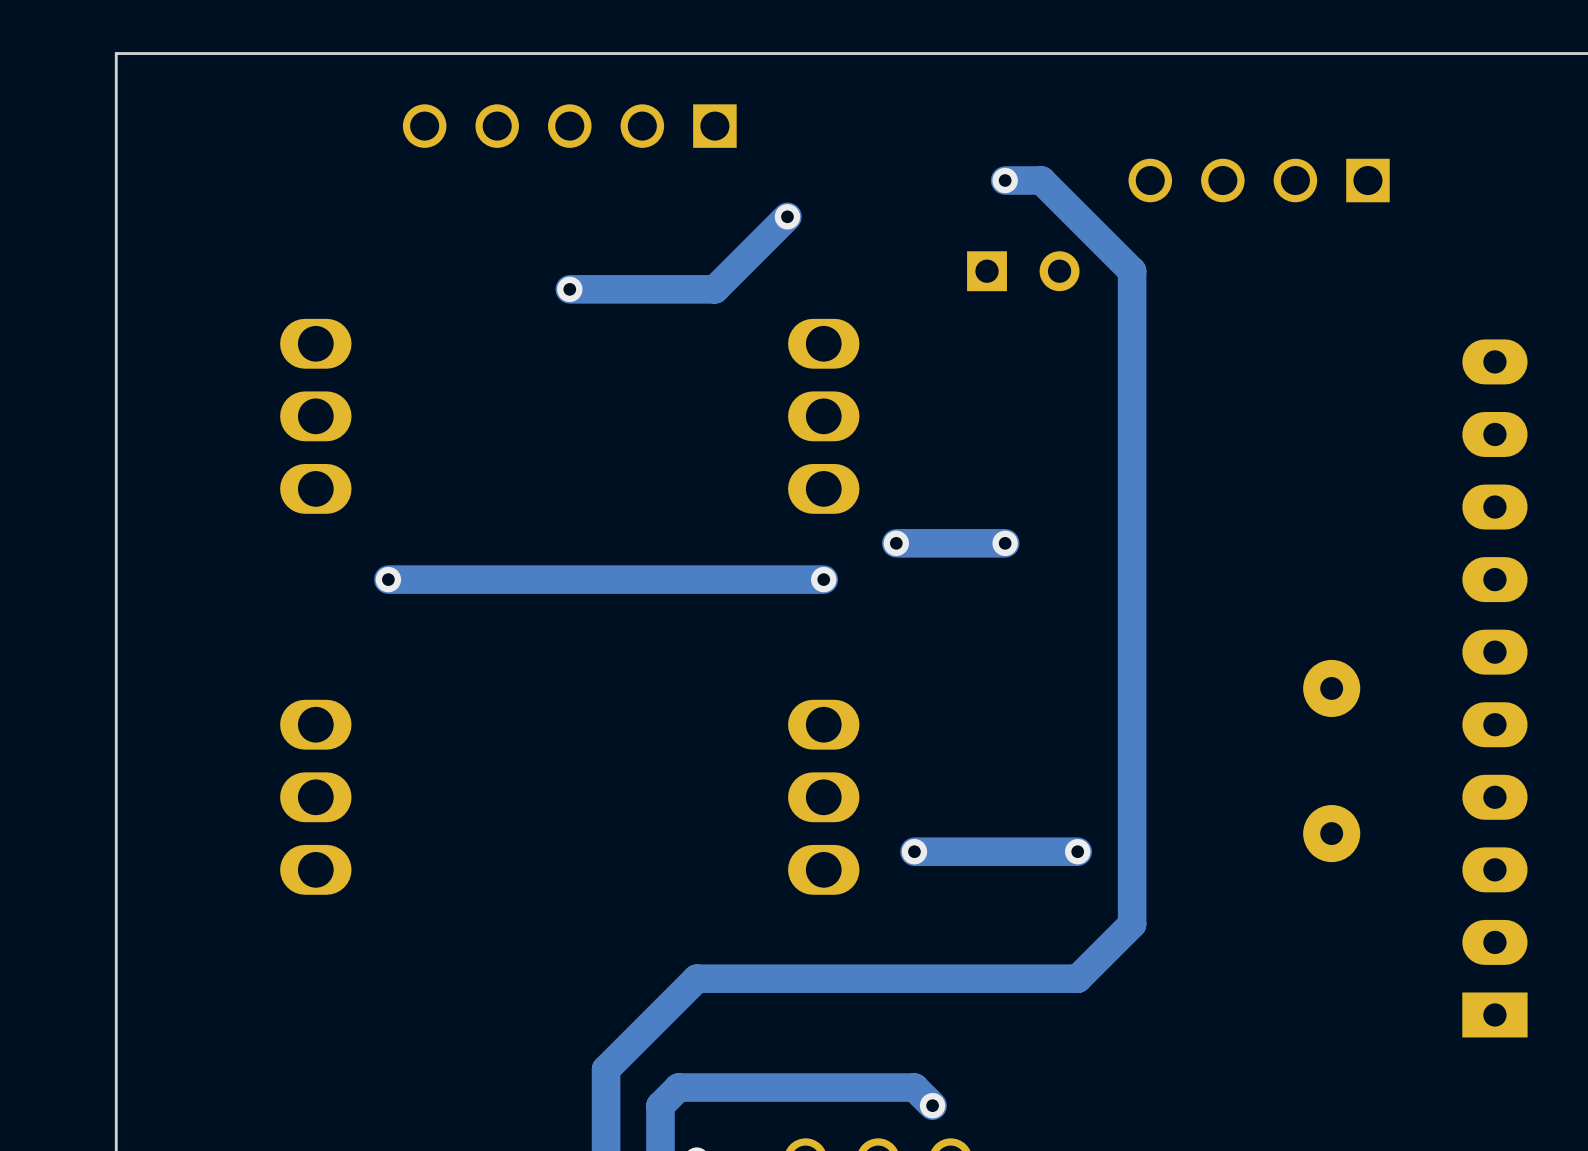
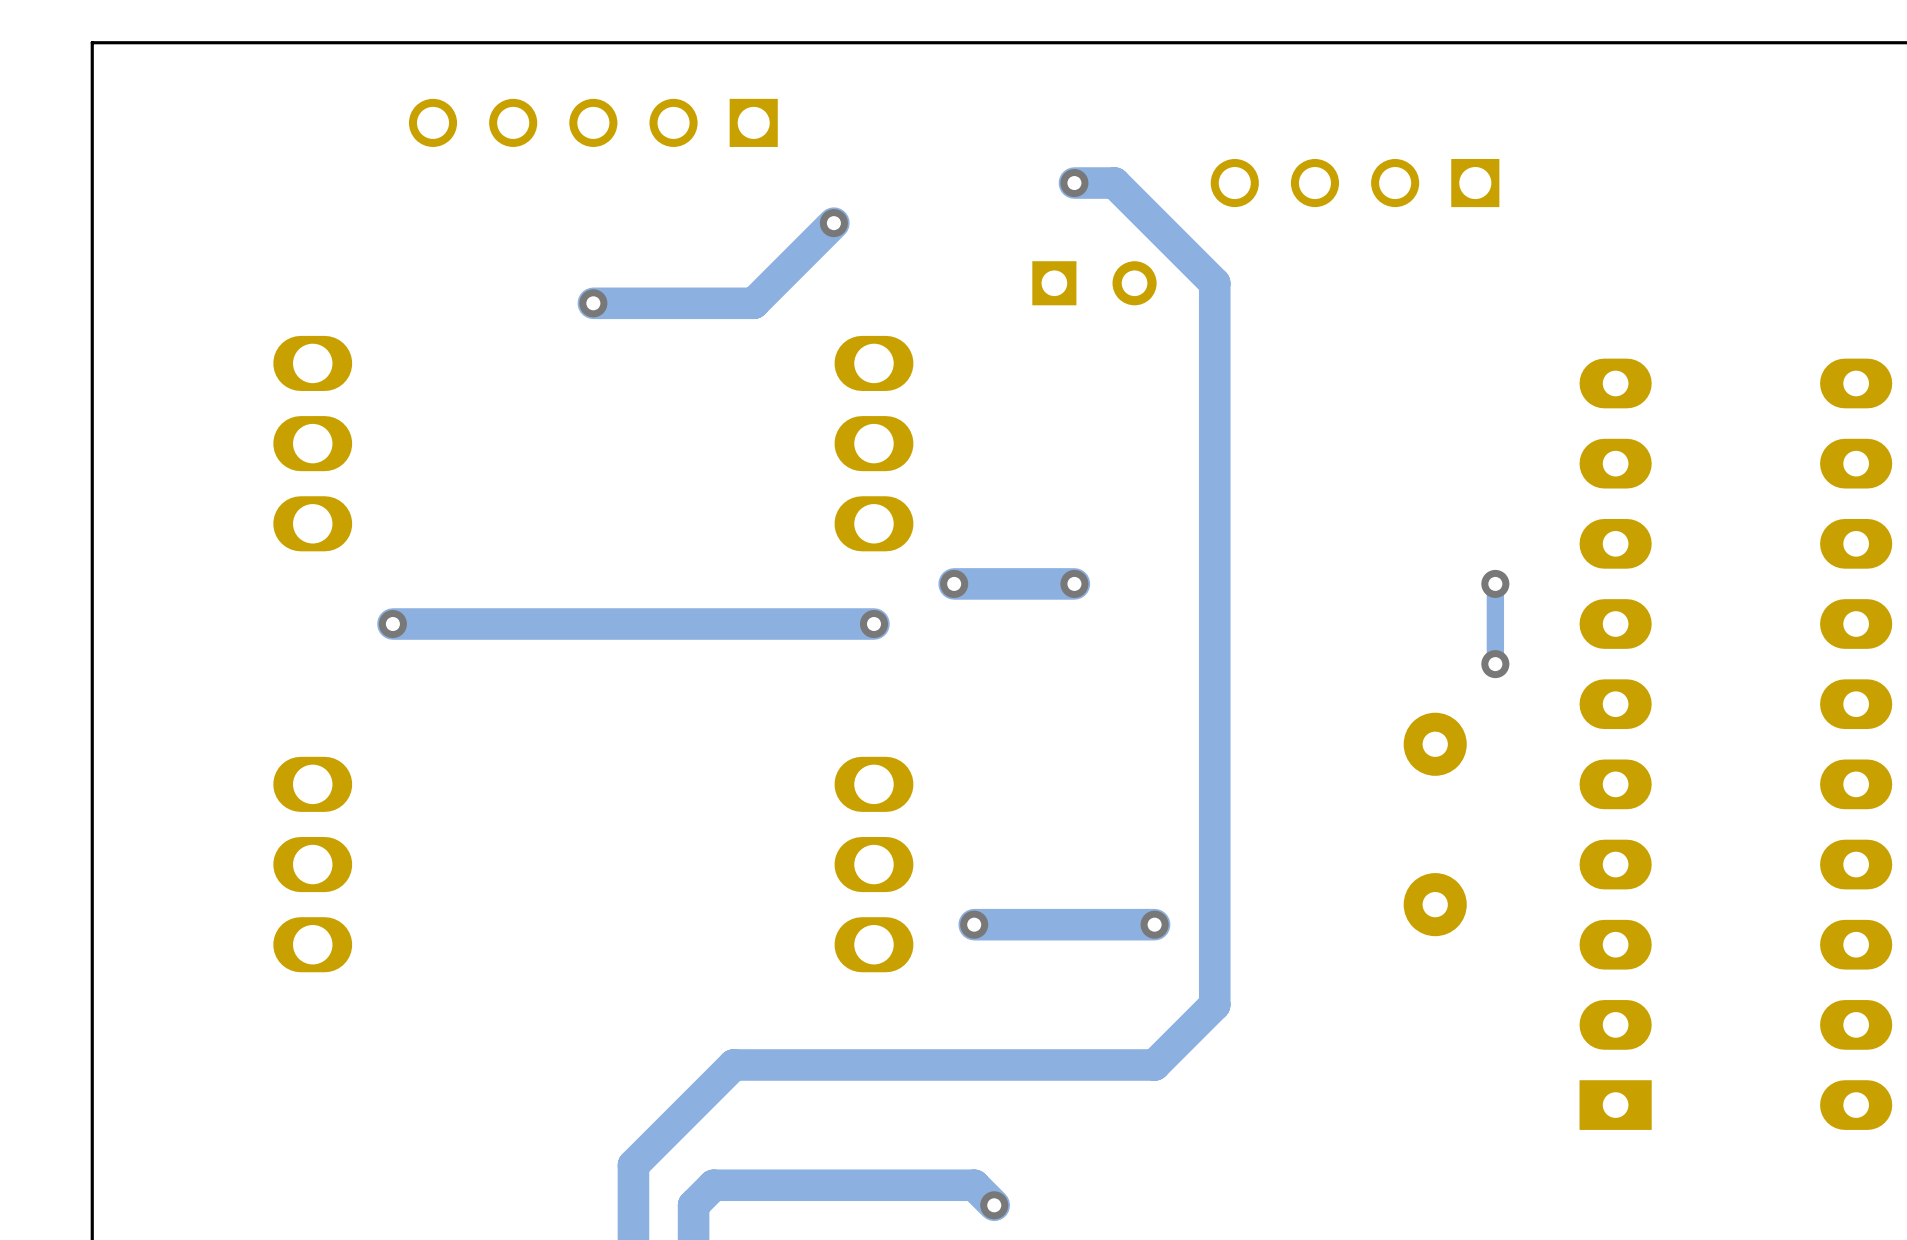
track: none -> (1495, 583) (1495, 664)
via: none -> (1495, 583)
via: none -> (1495, 664)

